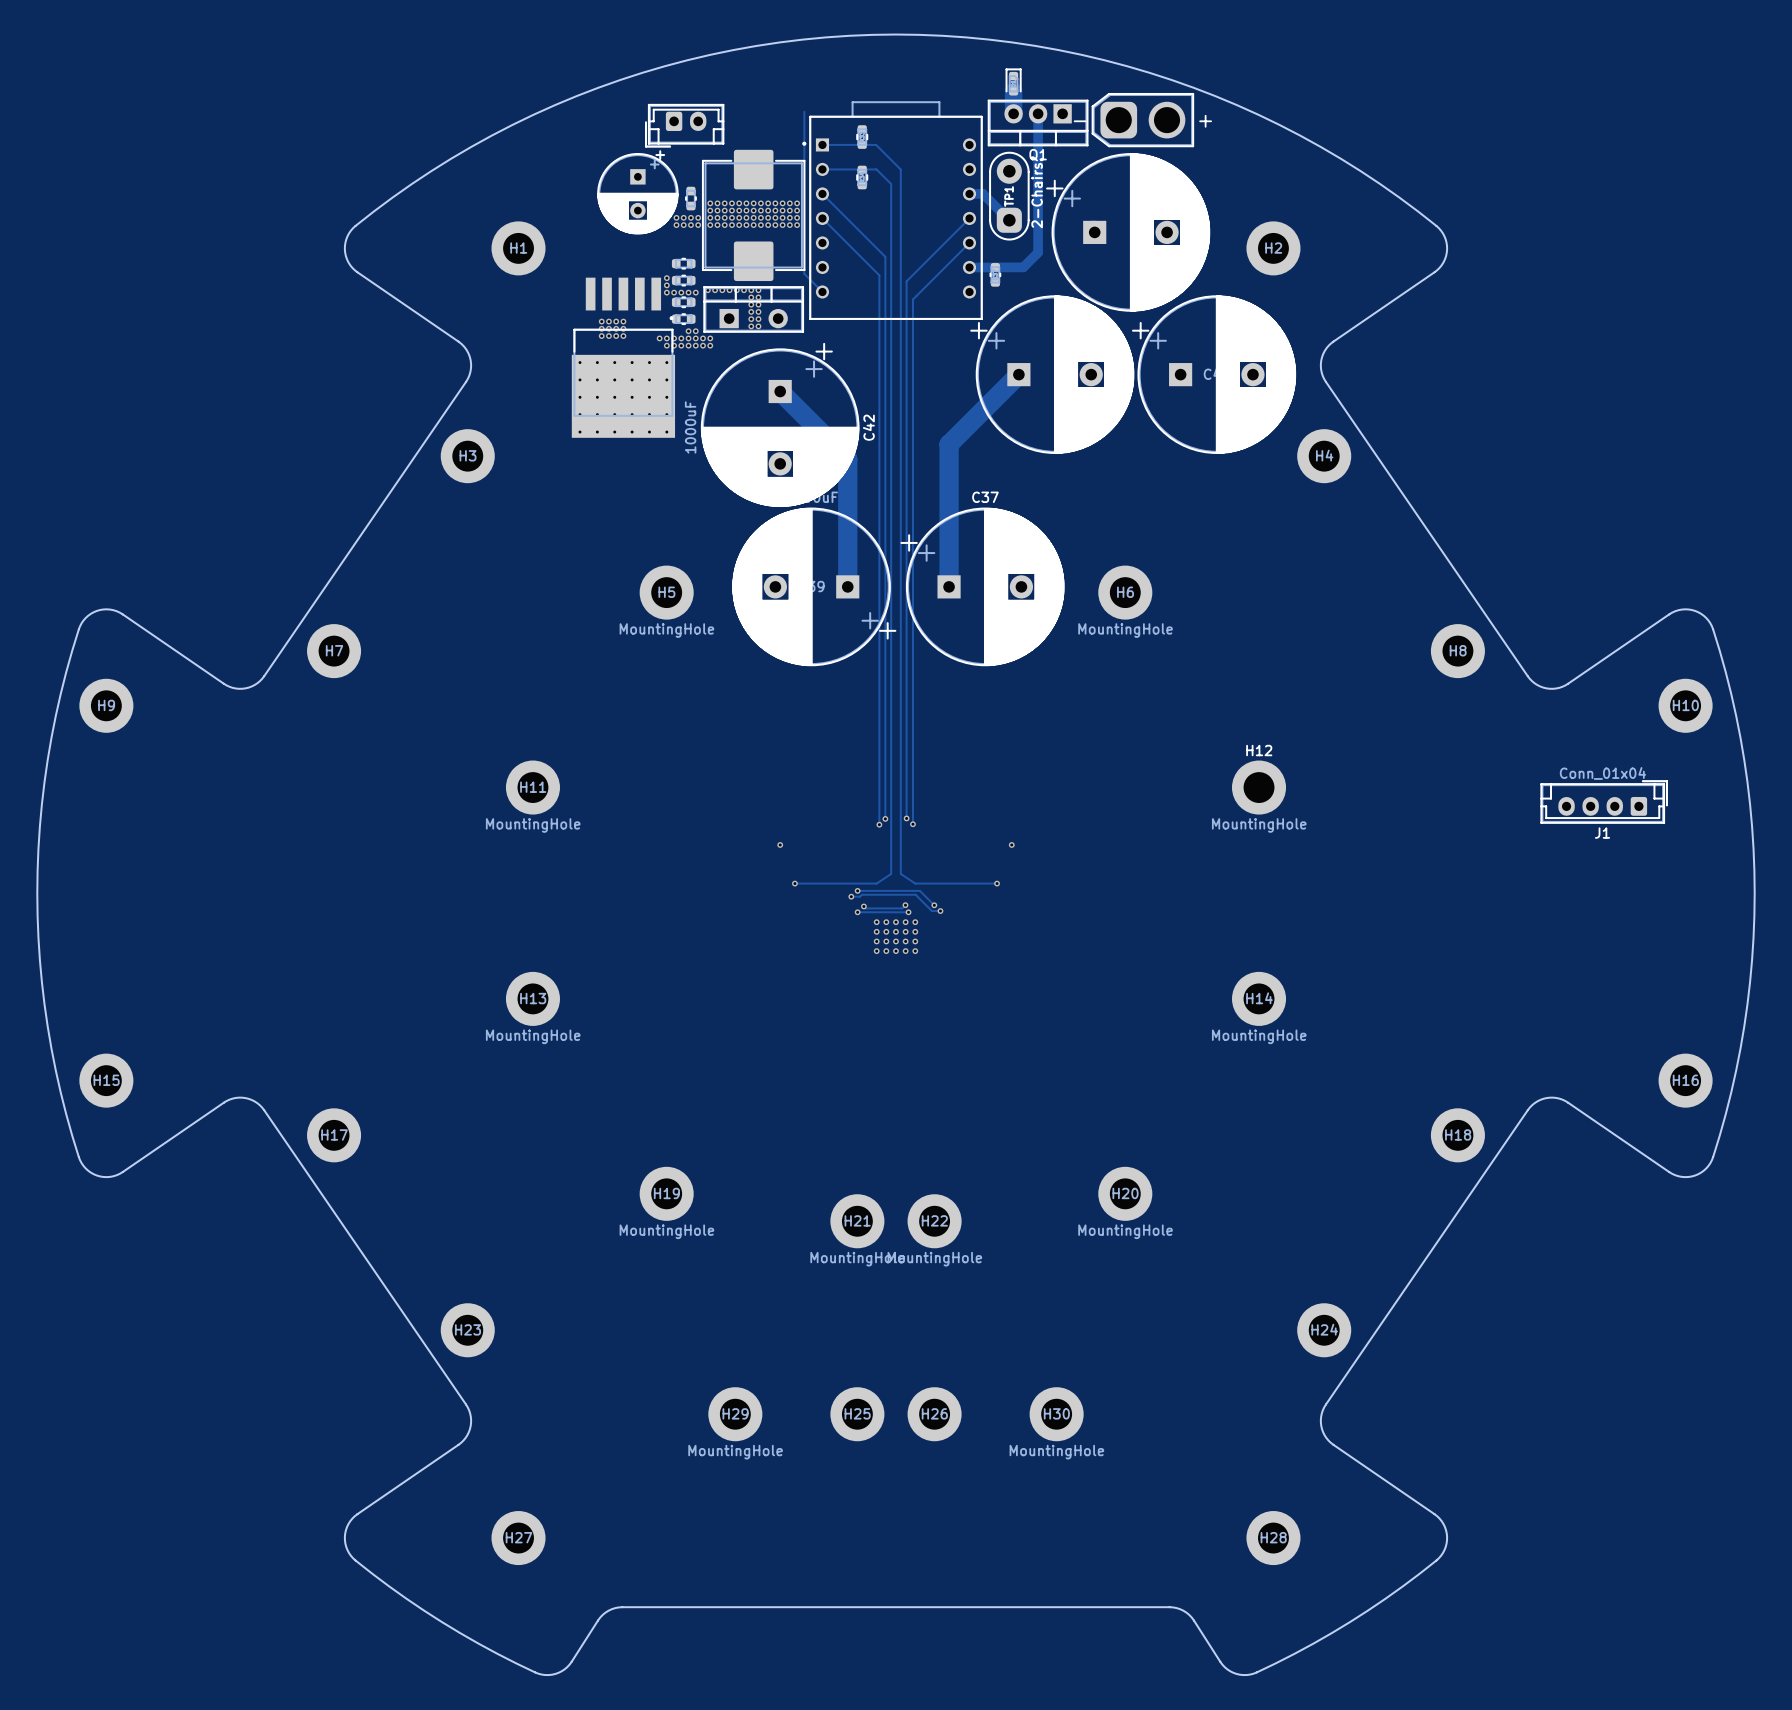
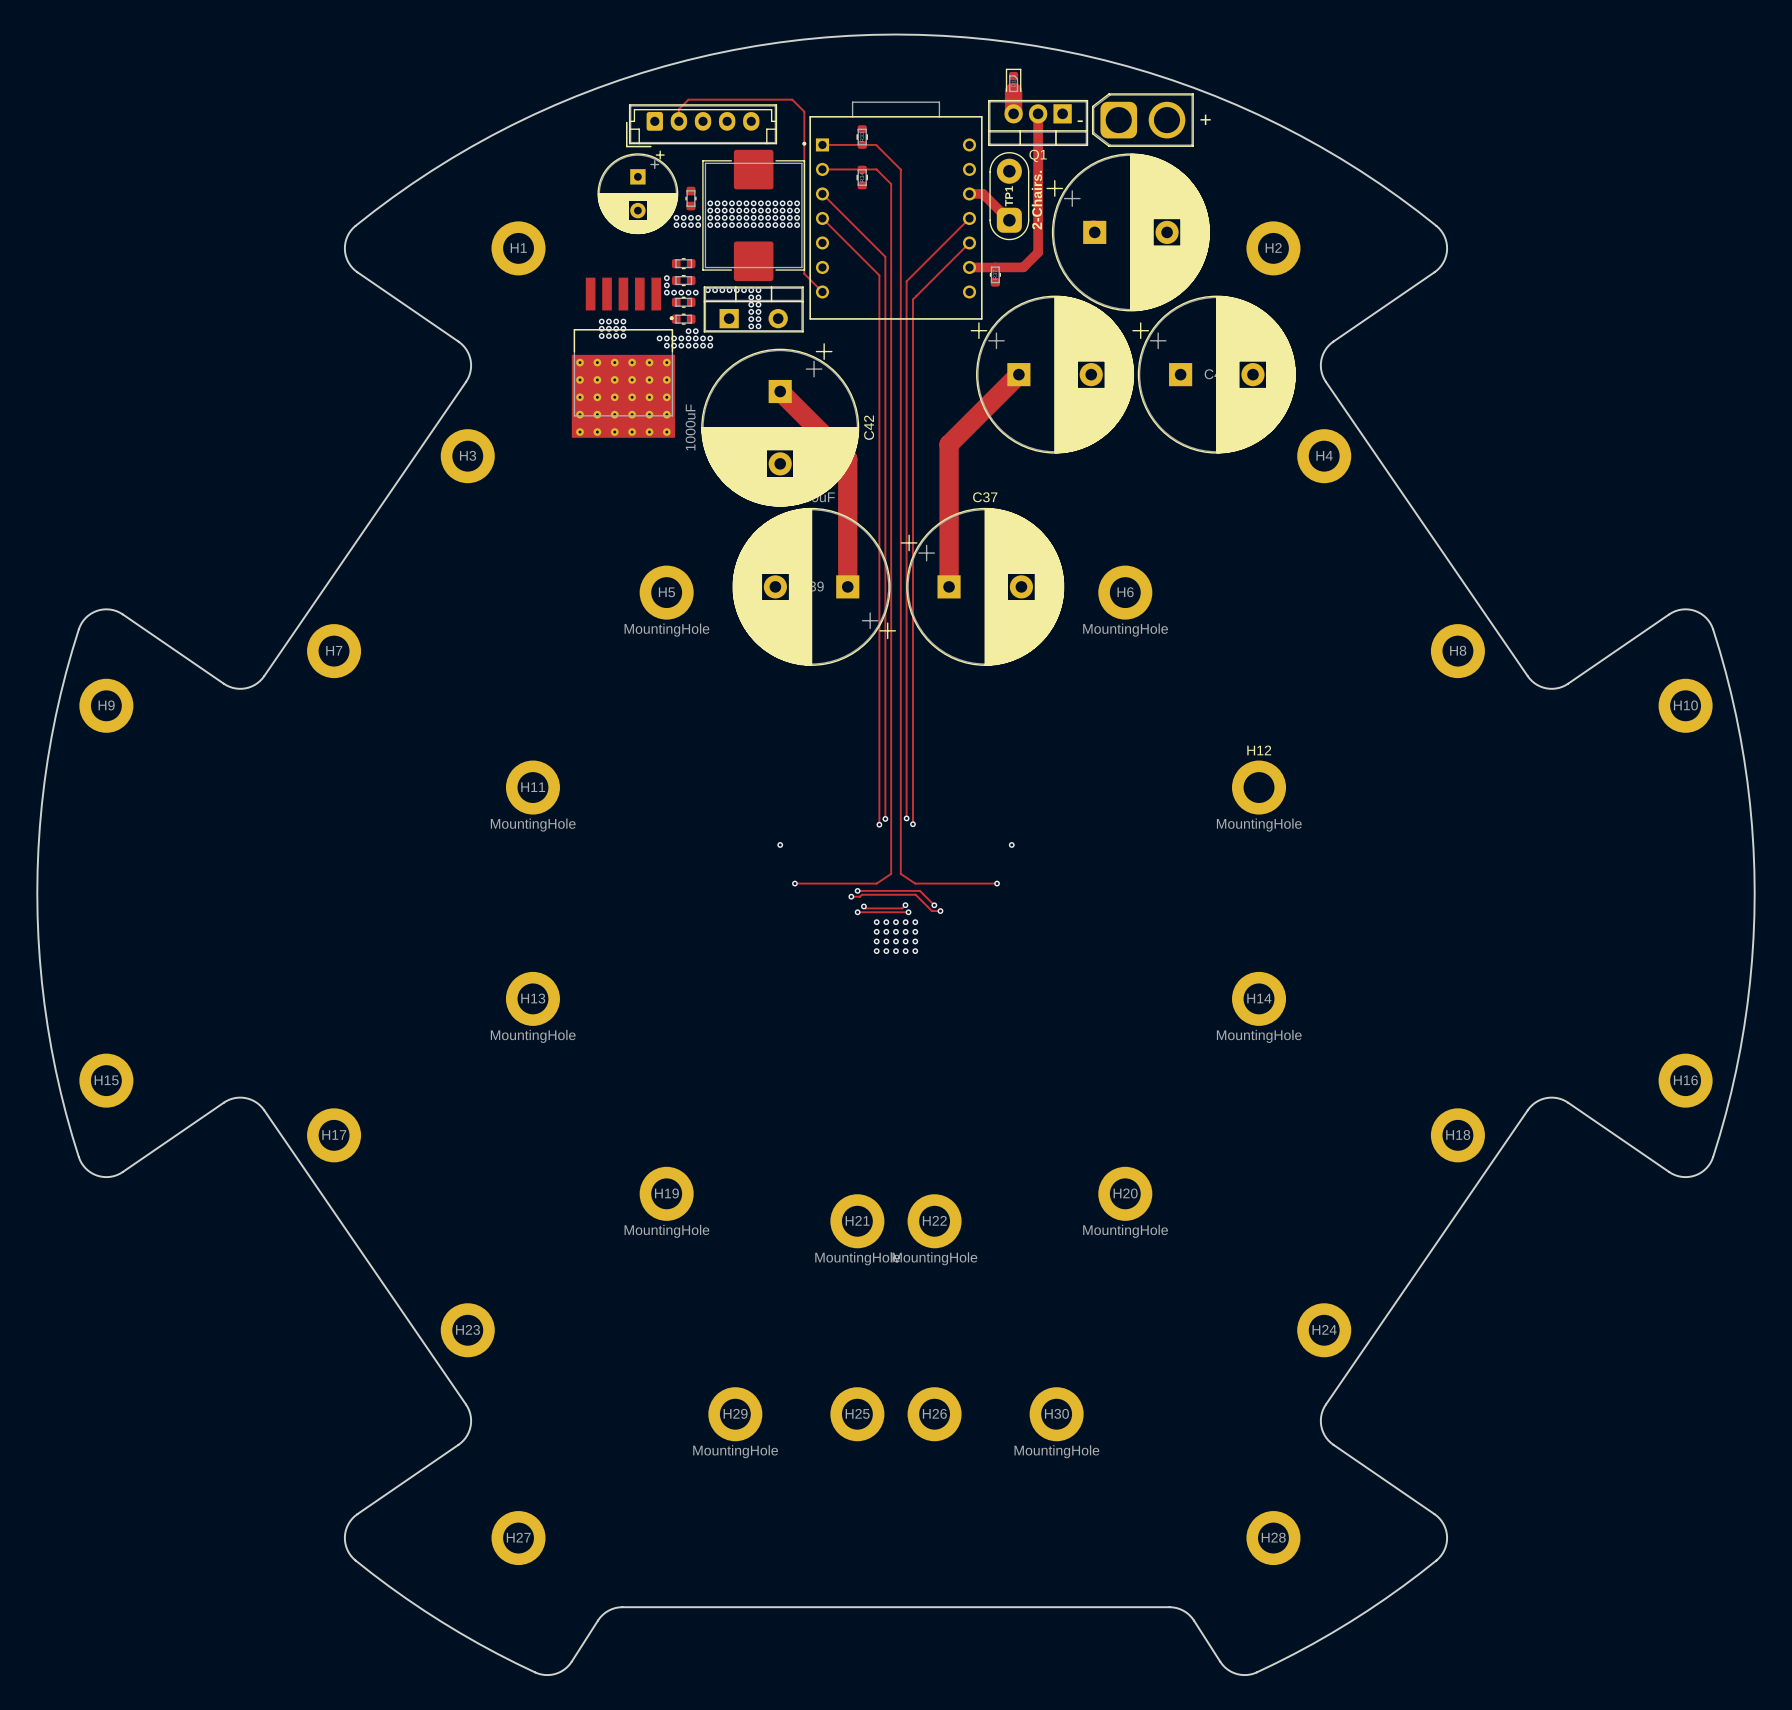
track: none -> (804, 111) (792, 99) (688, 99) (678, 109) (678, 121)
part: (684, 125) -> none
part: none -> (701, 125)
J1: Conn_01x04 (1604, 802) -> none

